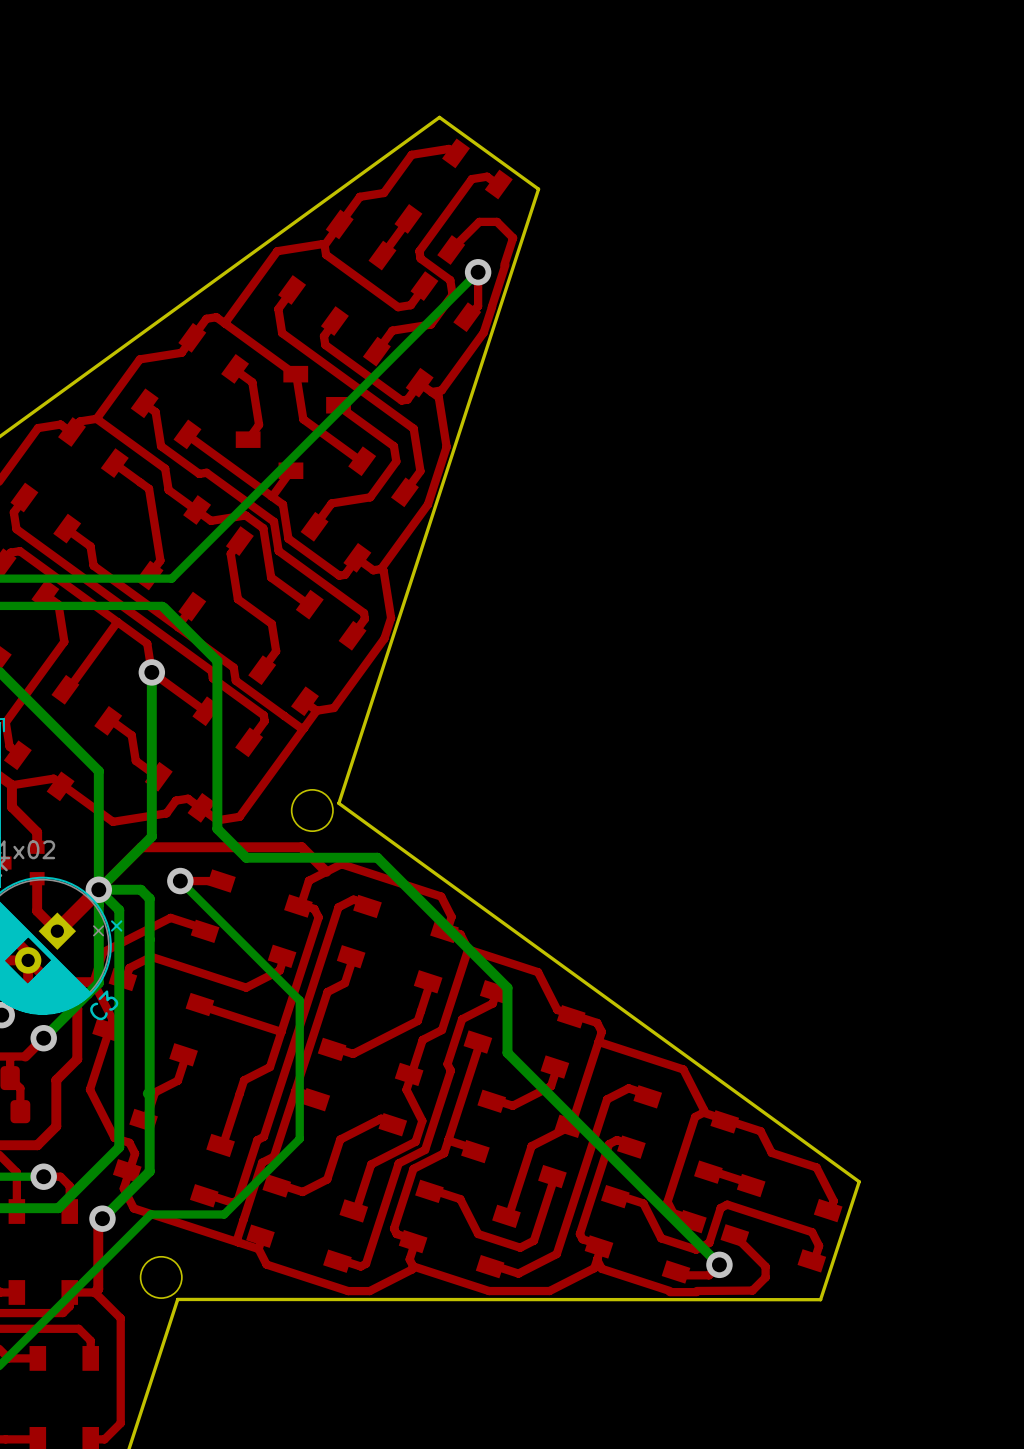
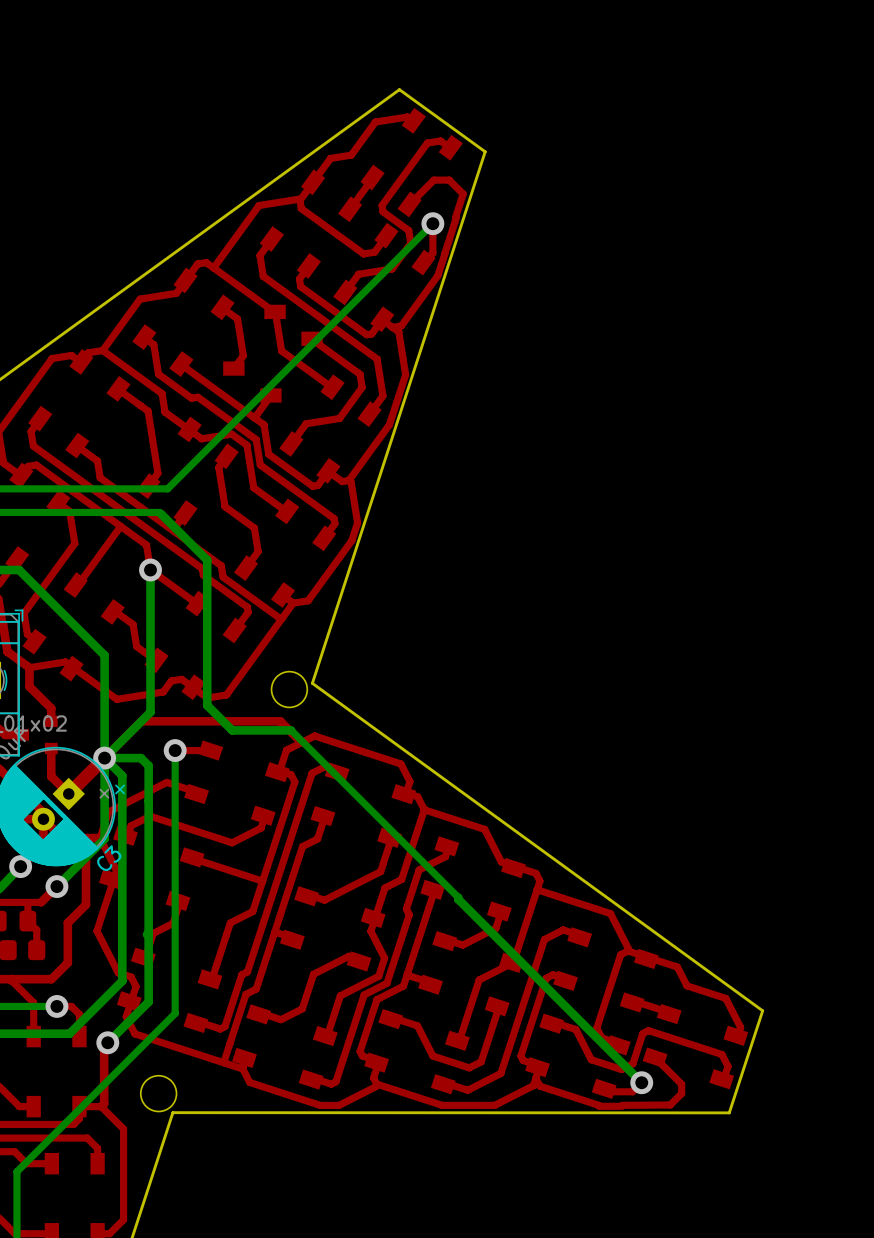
bottom track: (314, 857) (377, 857) (507, 987) (507, 1050) -> (291, 730) (458, 897)
bottom track: (180, 881) (299, 1000) (299, 1138) (224, 1214) (150, 1214) -> (175, 750) (175, 1013) (149, 1039)

